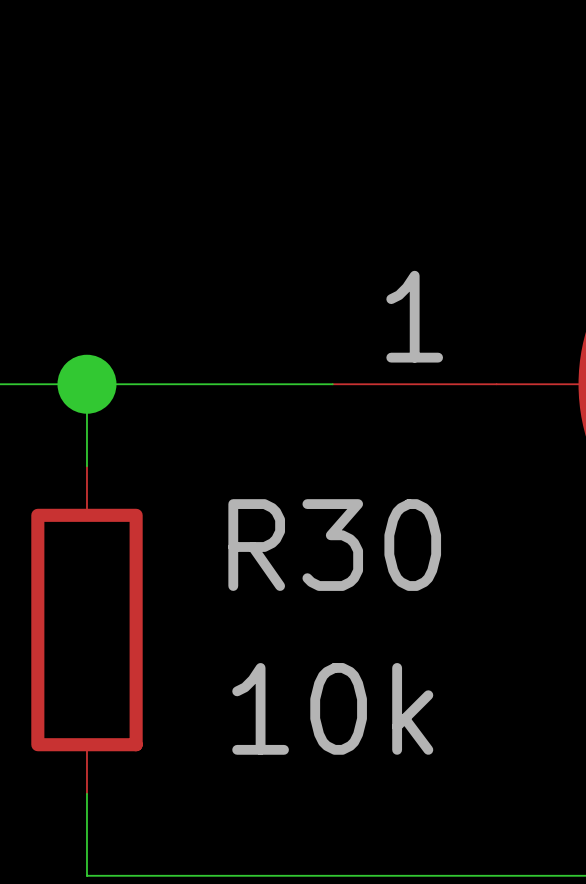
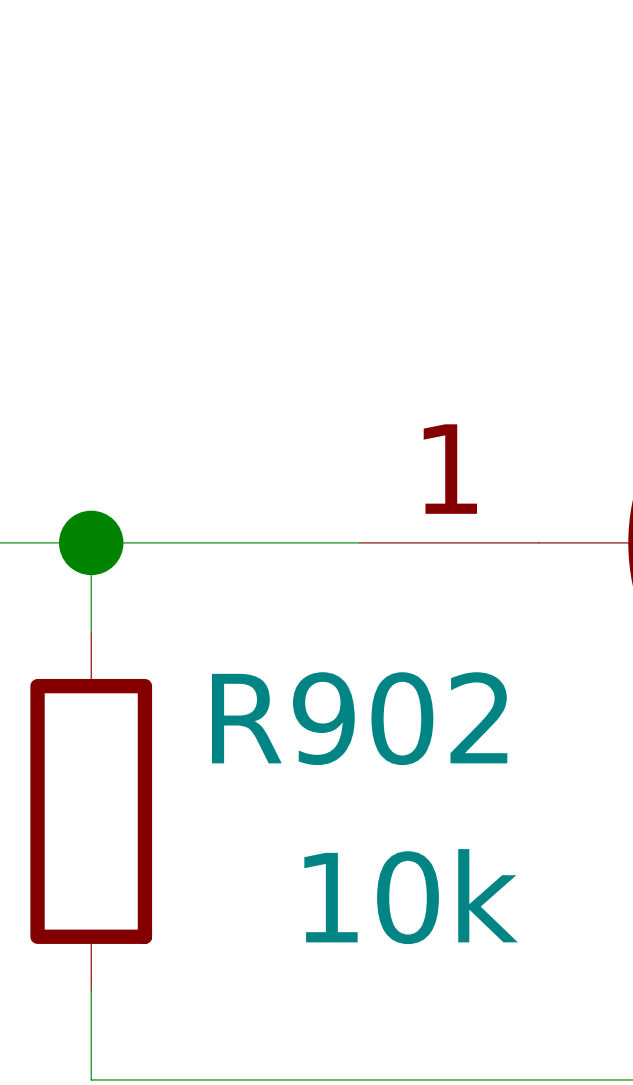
R30 name: R30 (334, 545) -> R902 (359, 718)
R30 value position: 10k (332, 708) -> 10k (411, 896)

